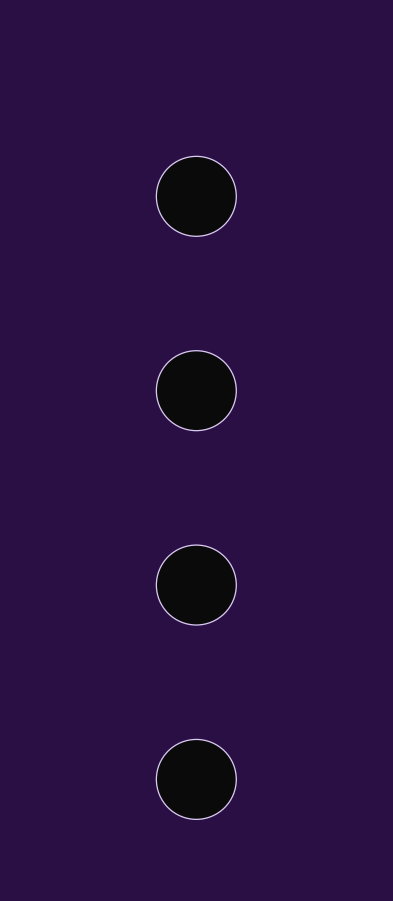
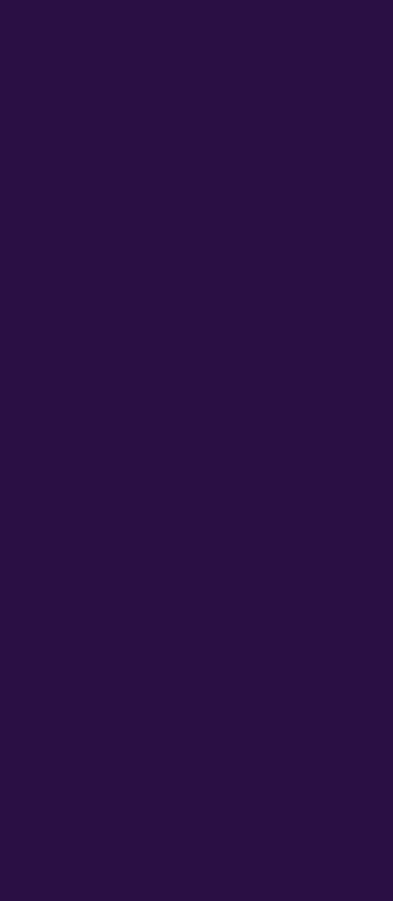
part: (196, 196) -> none
part: (196, 390) -> none
part: (196, 585) -> none
part: (196, 779) -> none

